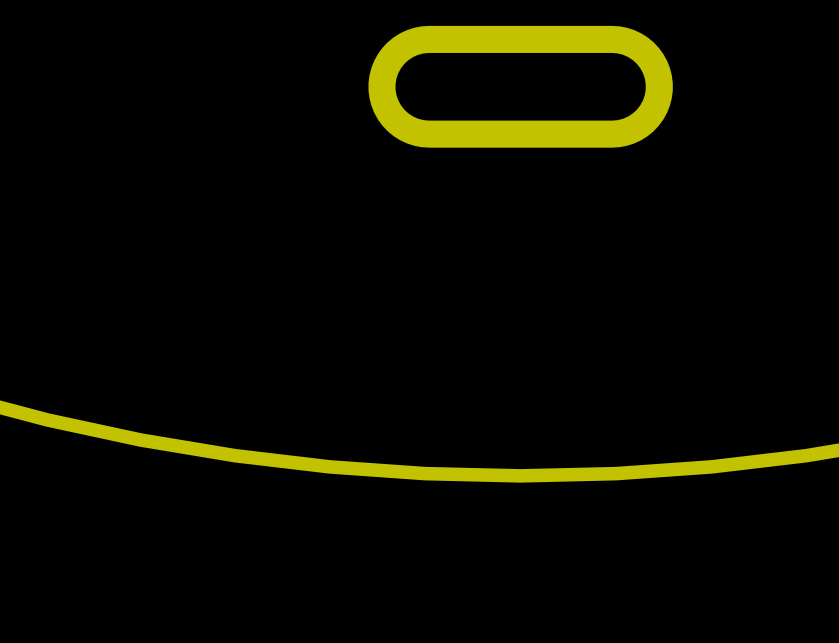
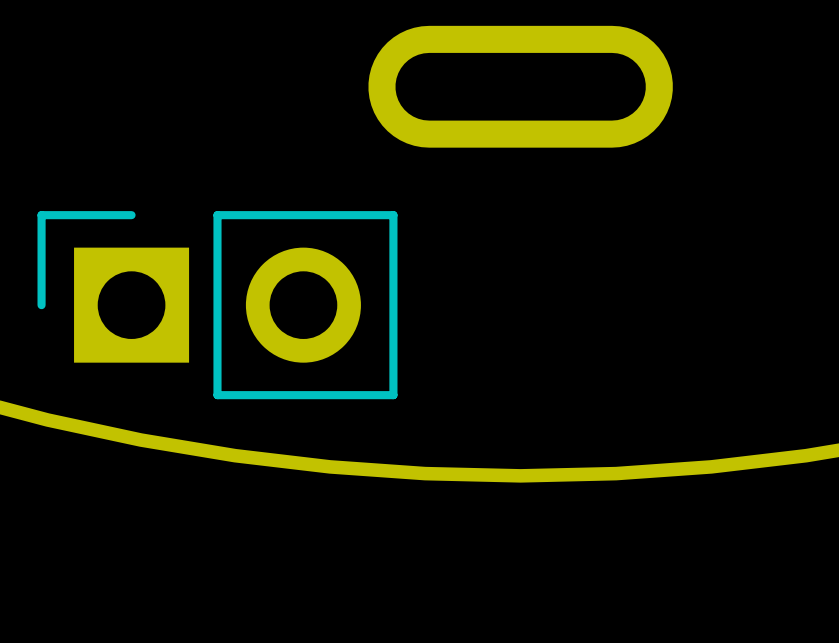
part: none -> (217, 305)

